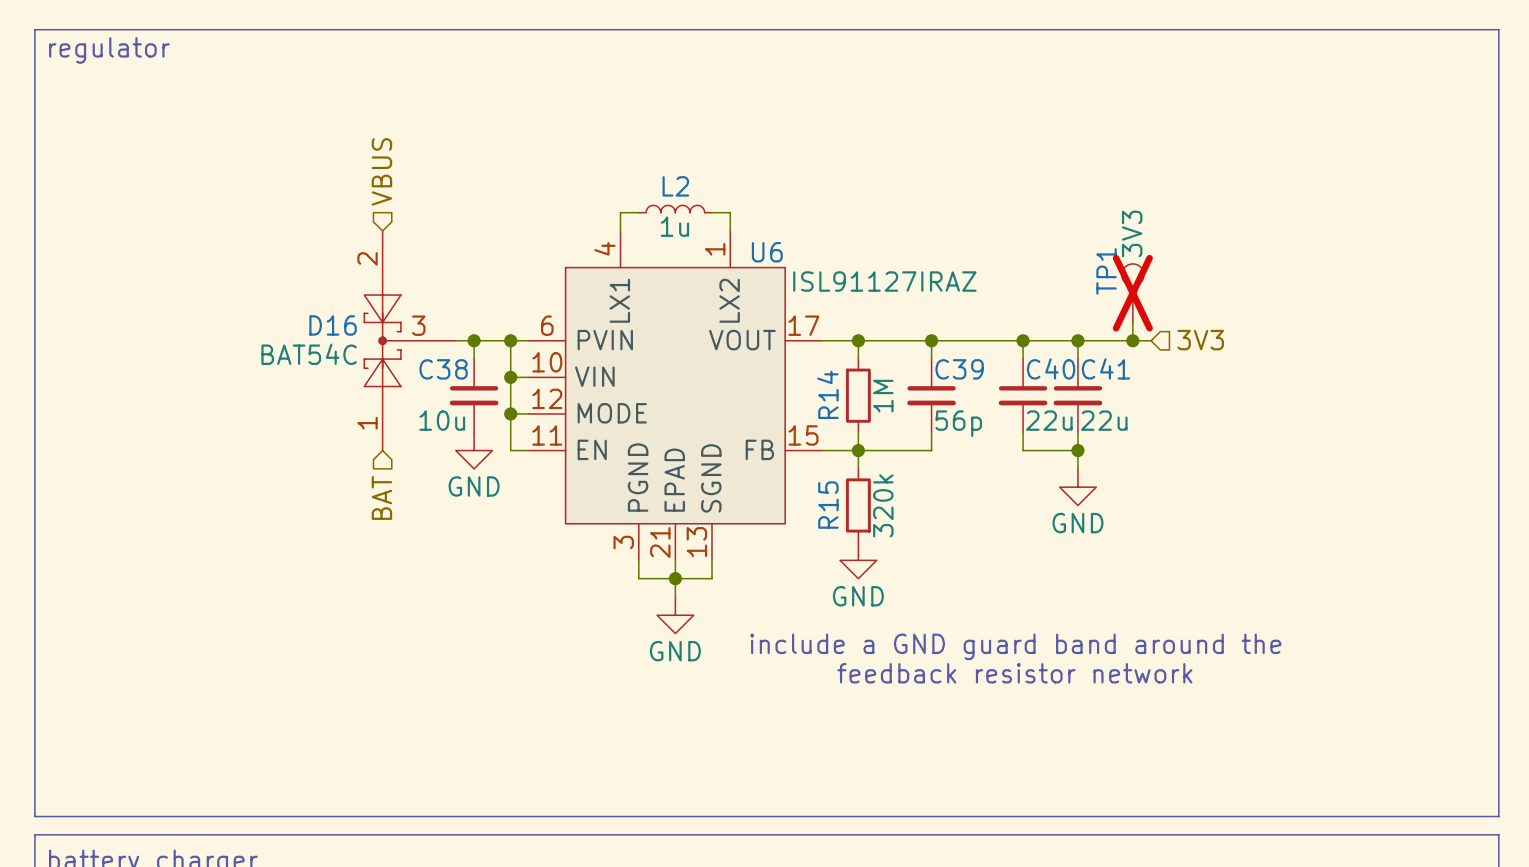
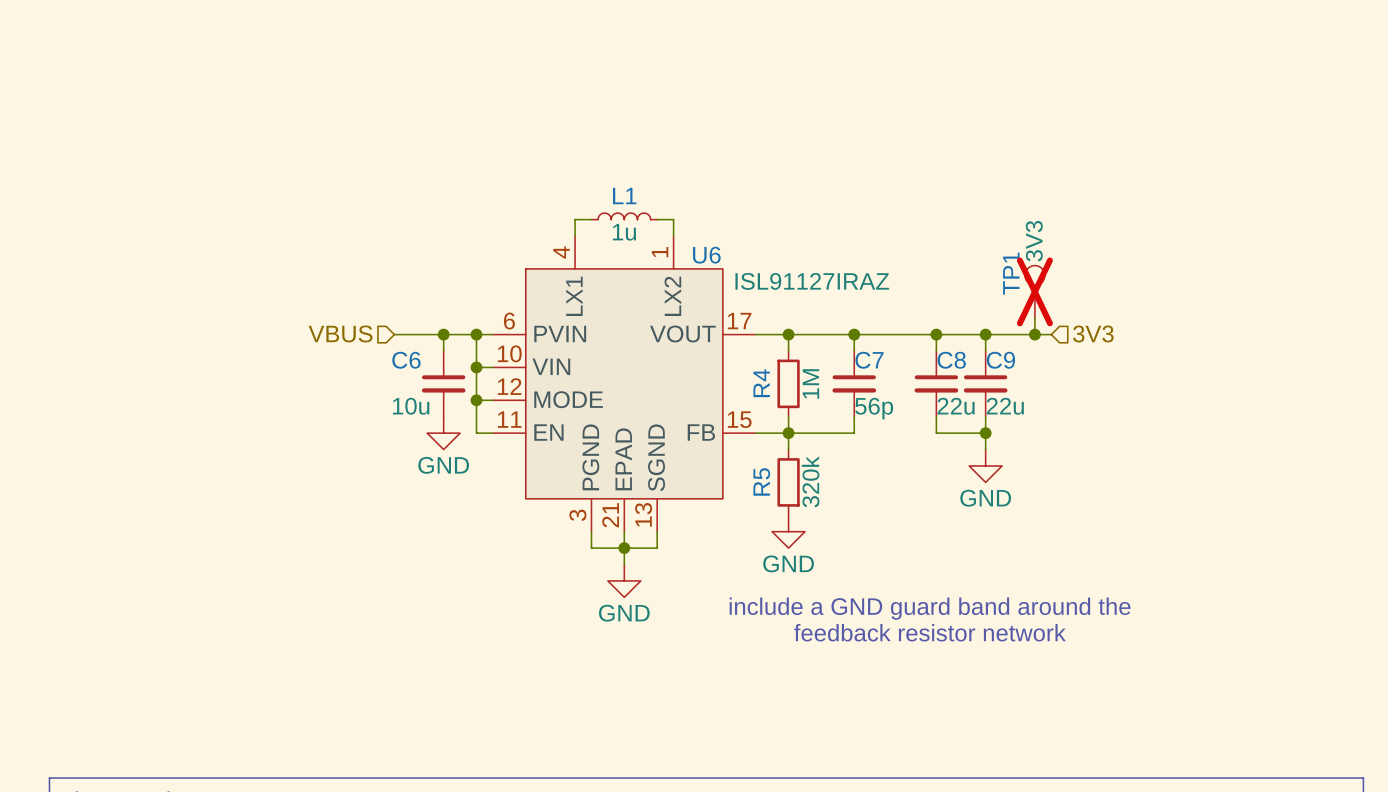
line: (34, 29) (1498, 29) (1498, 816) (34, 816) (34, 29) -> none
text: regulator (109, 50) -> none
hierarchical label rotation: 0° (381, 171) -> 90° counterclockwise (340, 333)
hierarchical label position: VBUS (381, 171) -> VBUS (340, 333)
L2 name: L2 (675, 186) -> L1 (624, 196)
D16: BAT54C (410, 340) -> none
C40 name: C40 (1051, 368) -> C8 (951, 360)
C41 name: C41 (1105, 368) -> C9 (1000, 360)
C38 name: C38 (443, 369) -> C6 (406, 360)
C39 name: C39 (959, 369) -> C7 (869, 360)
R14 name: R14 (827, 394) -> R4 (761, 383)
hierarchical label: BAT (381, 497) -> none
R15 name: R15 (828, 505) -> R5 (761, 481)

